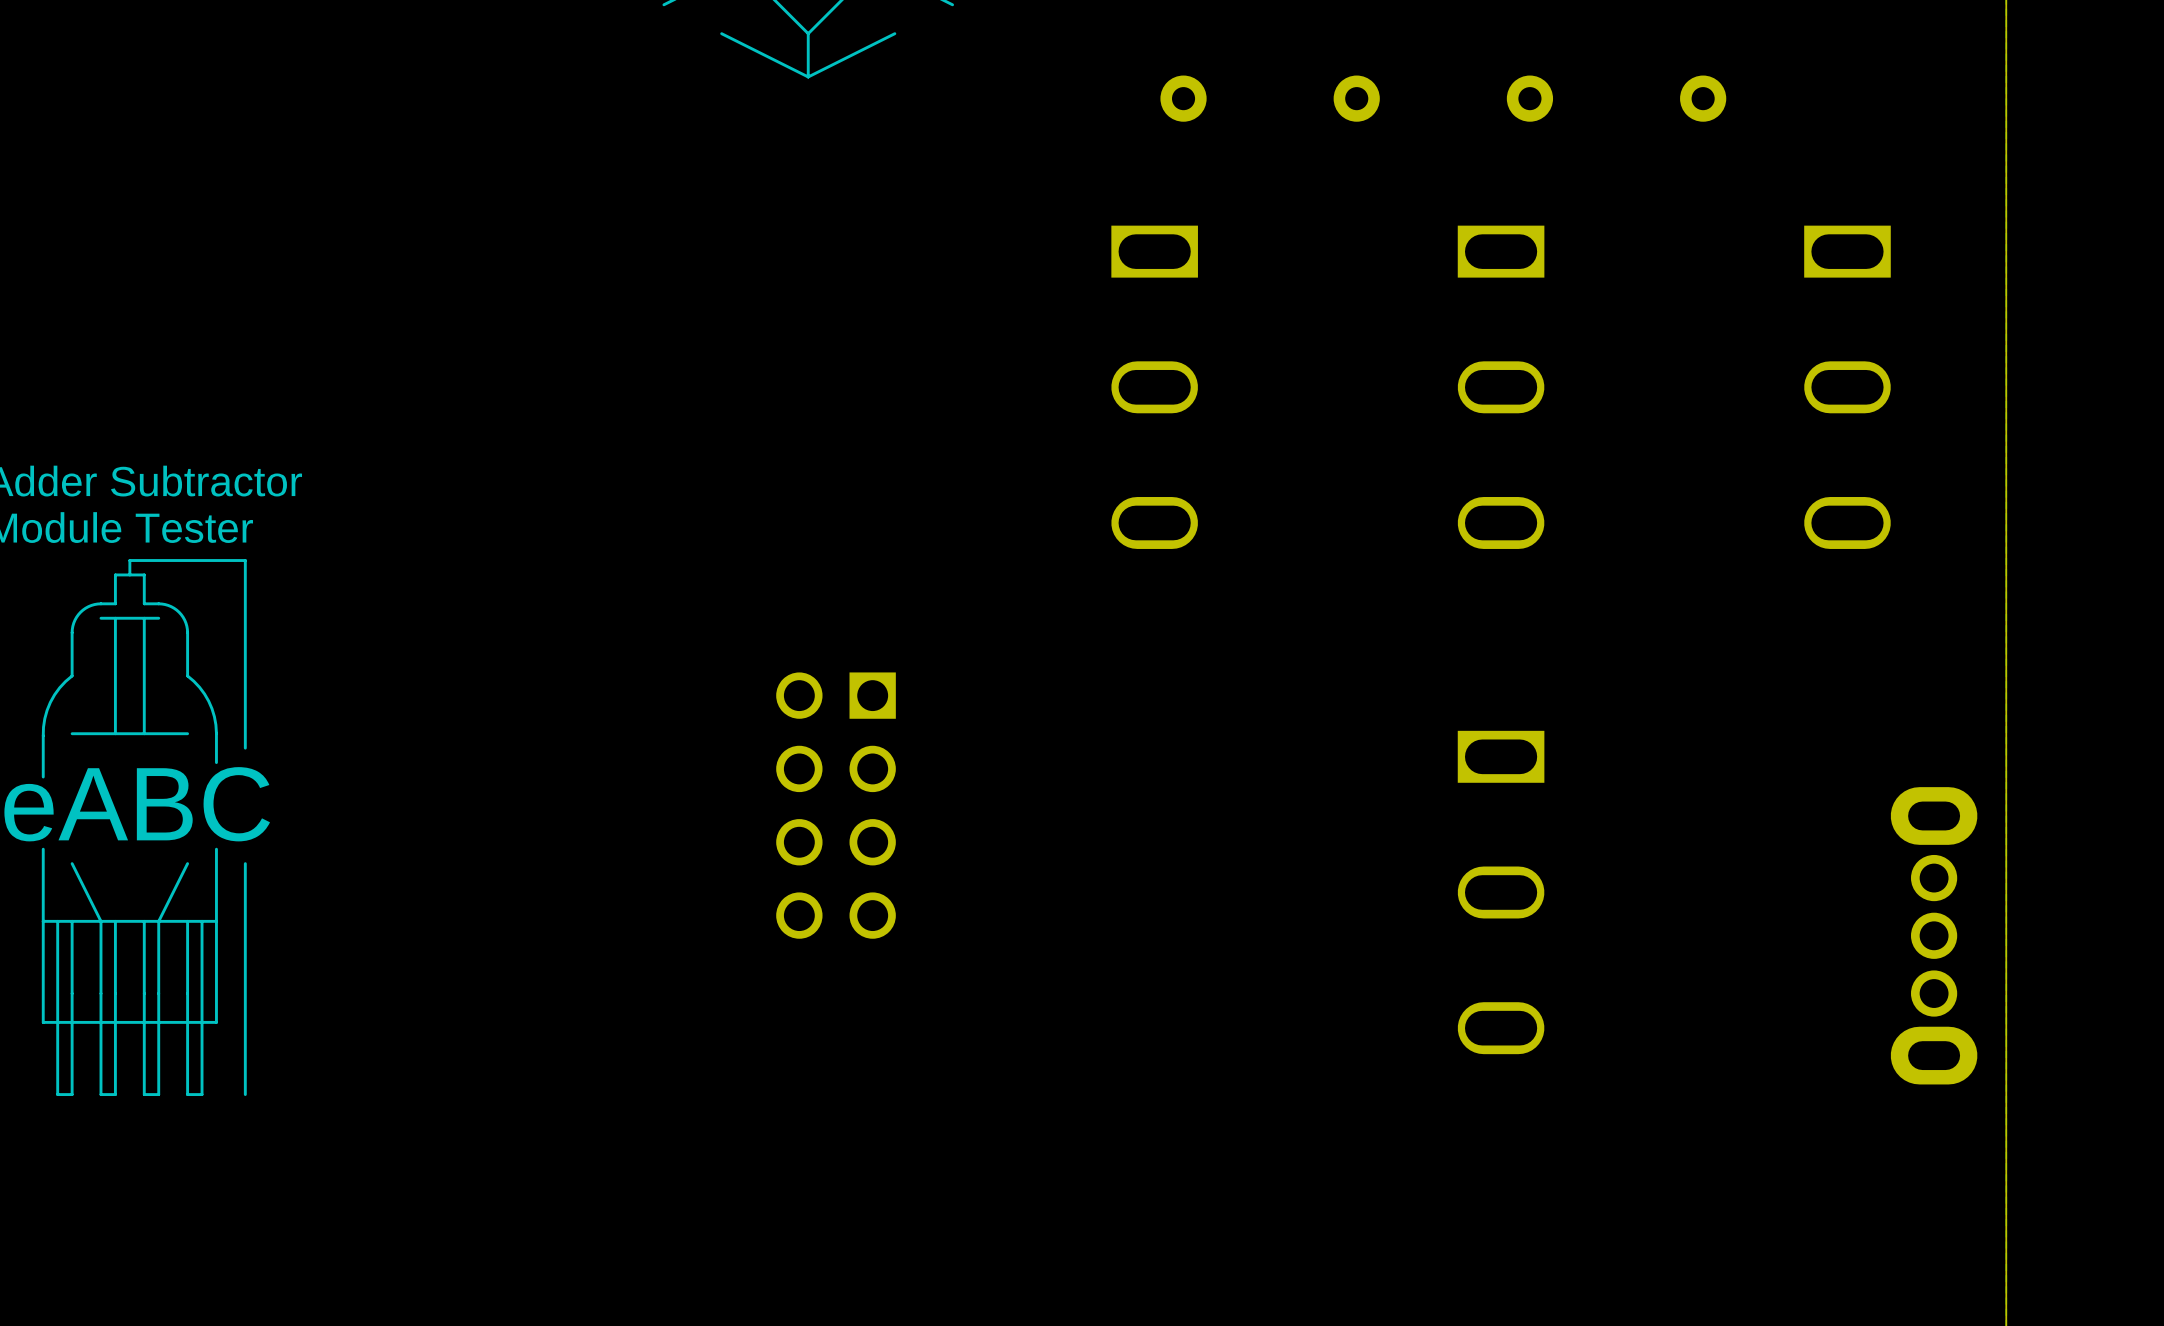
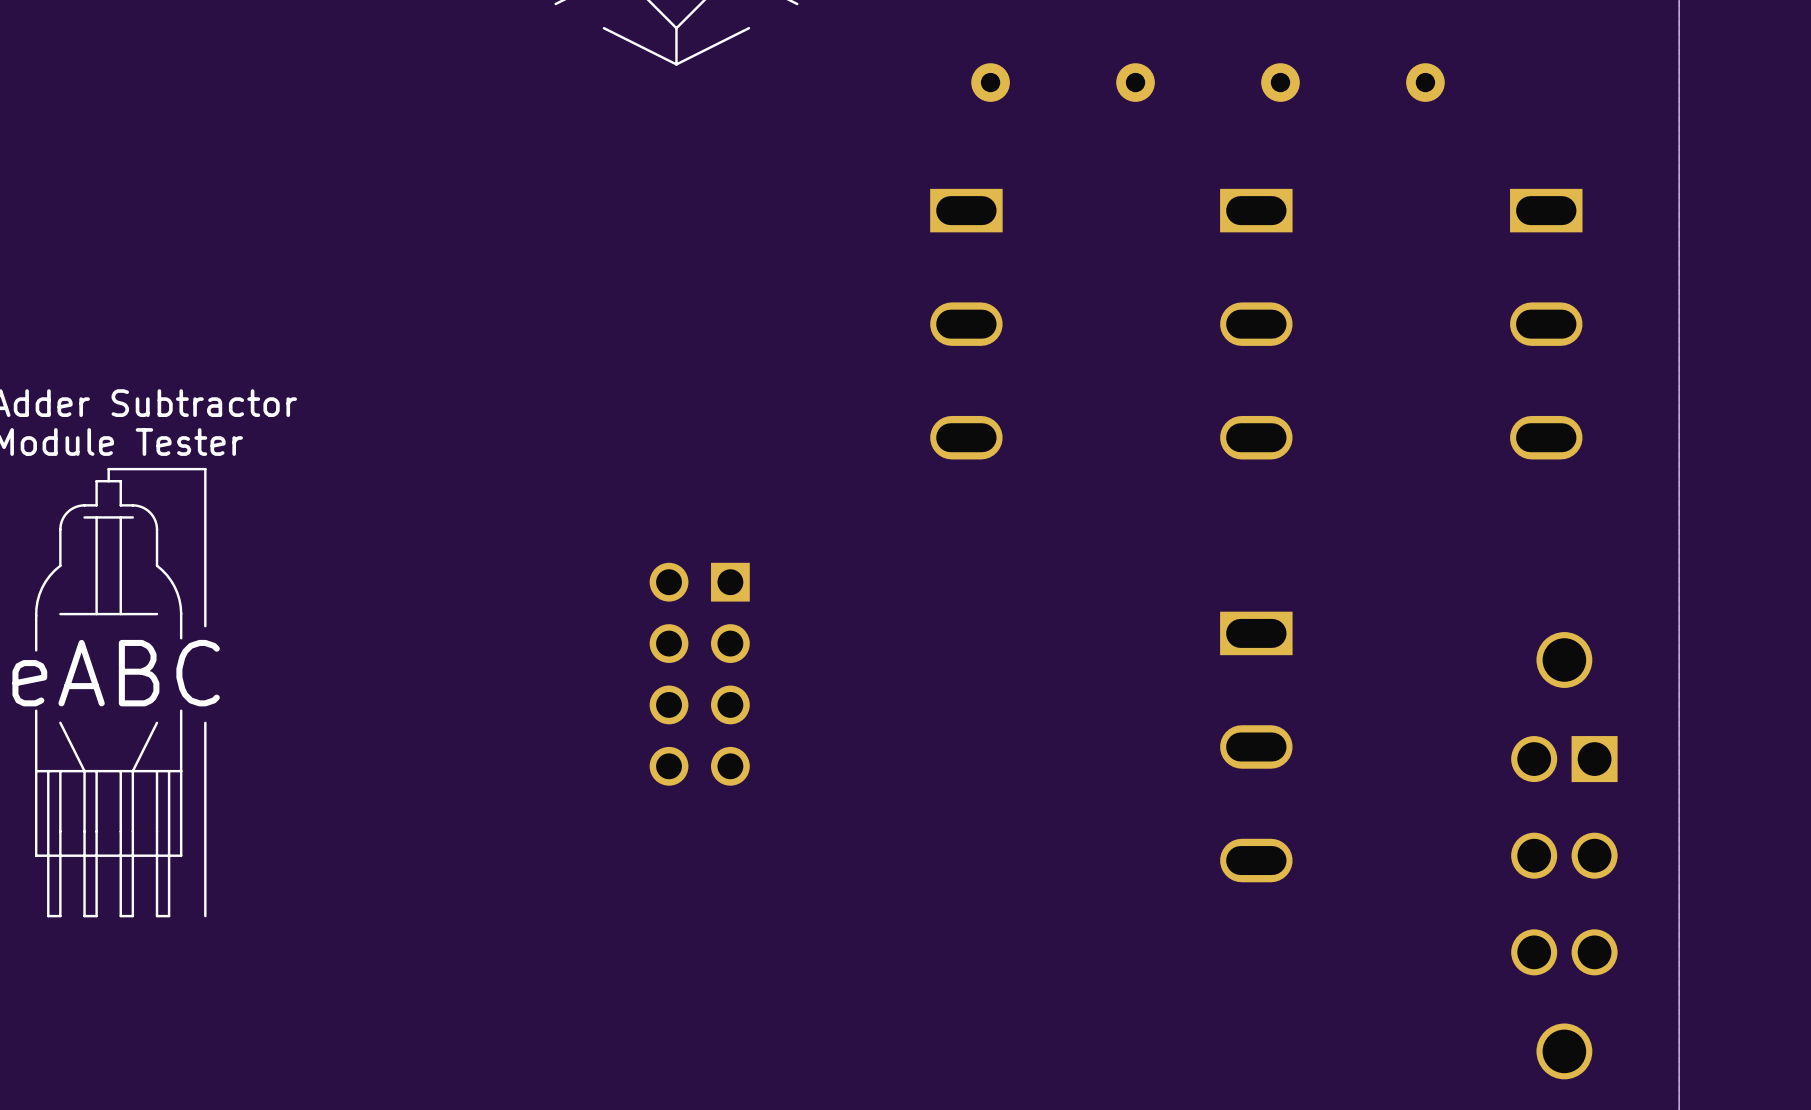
part: (1934, 935) -> none
part: none -> (1564, 855)

